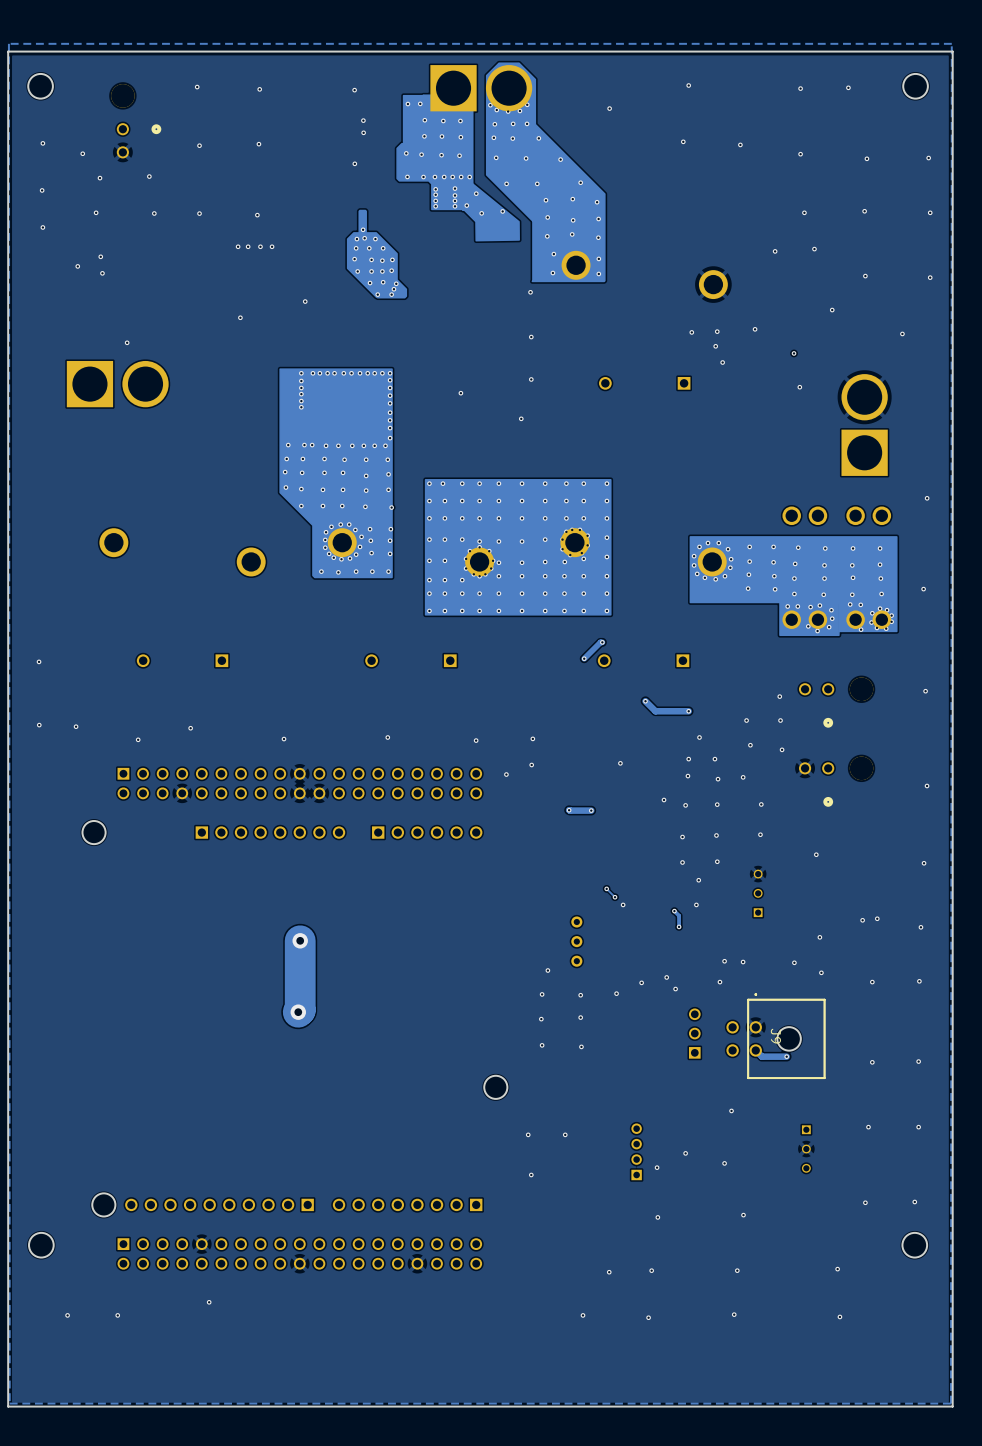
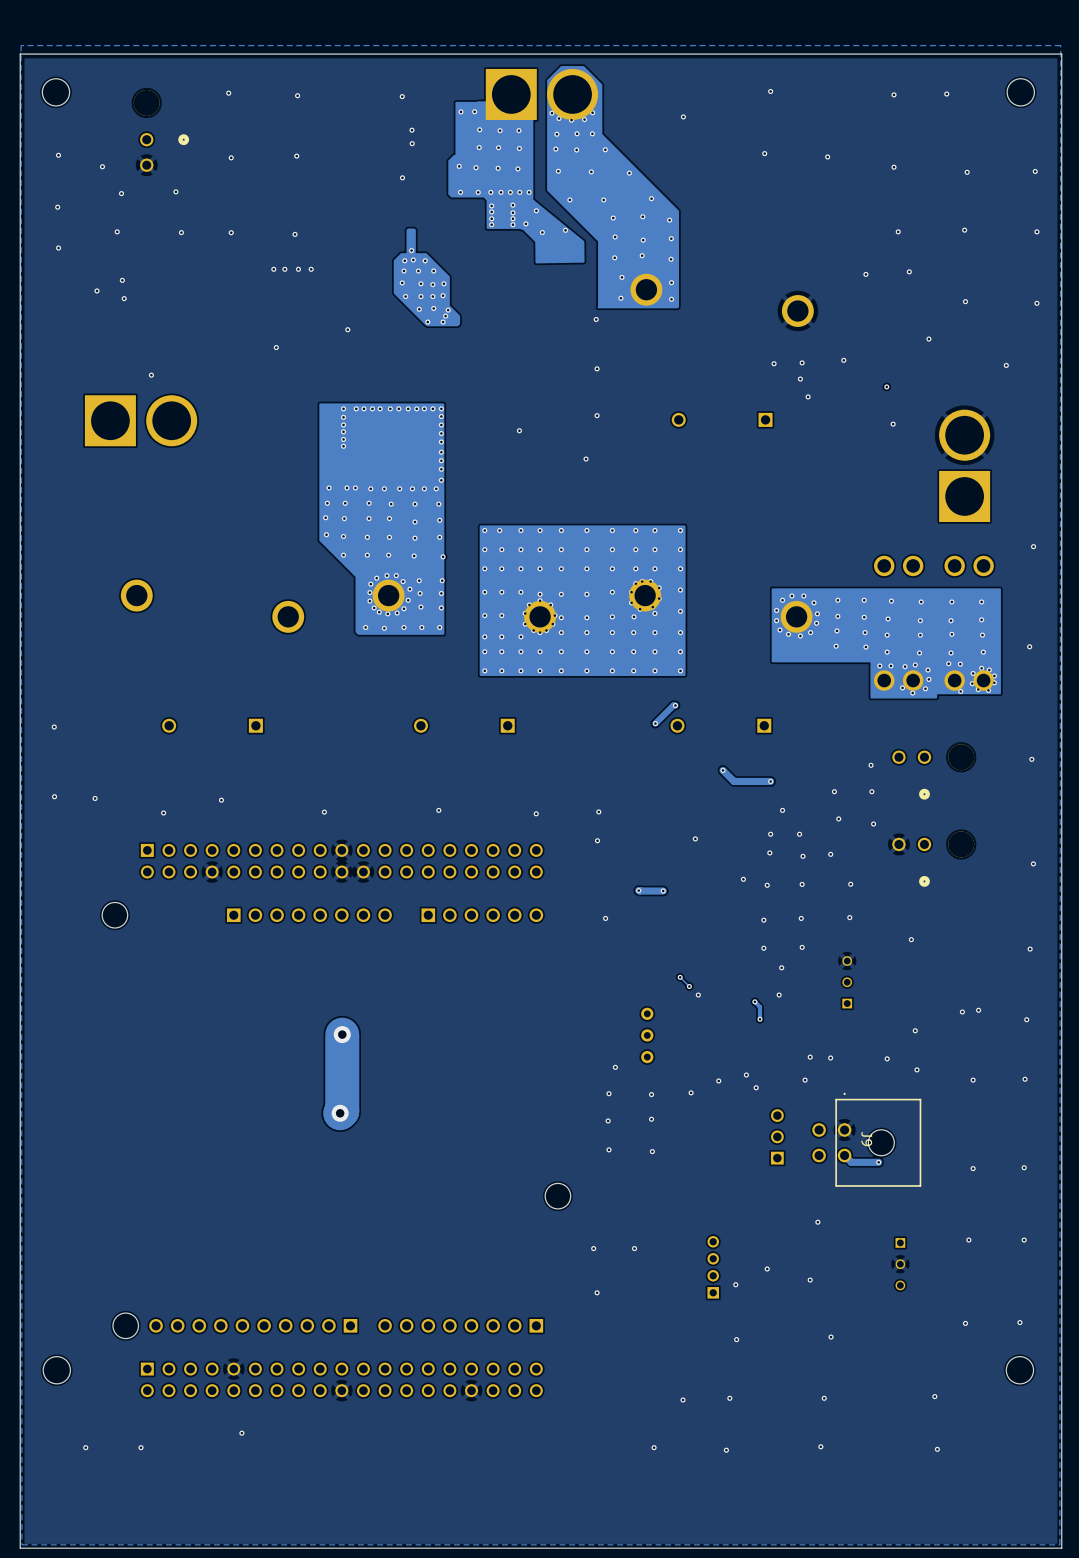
via: (506, 774) -> none
via: none -> (605, 918)

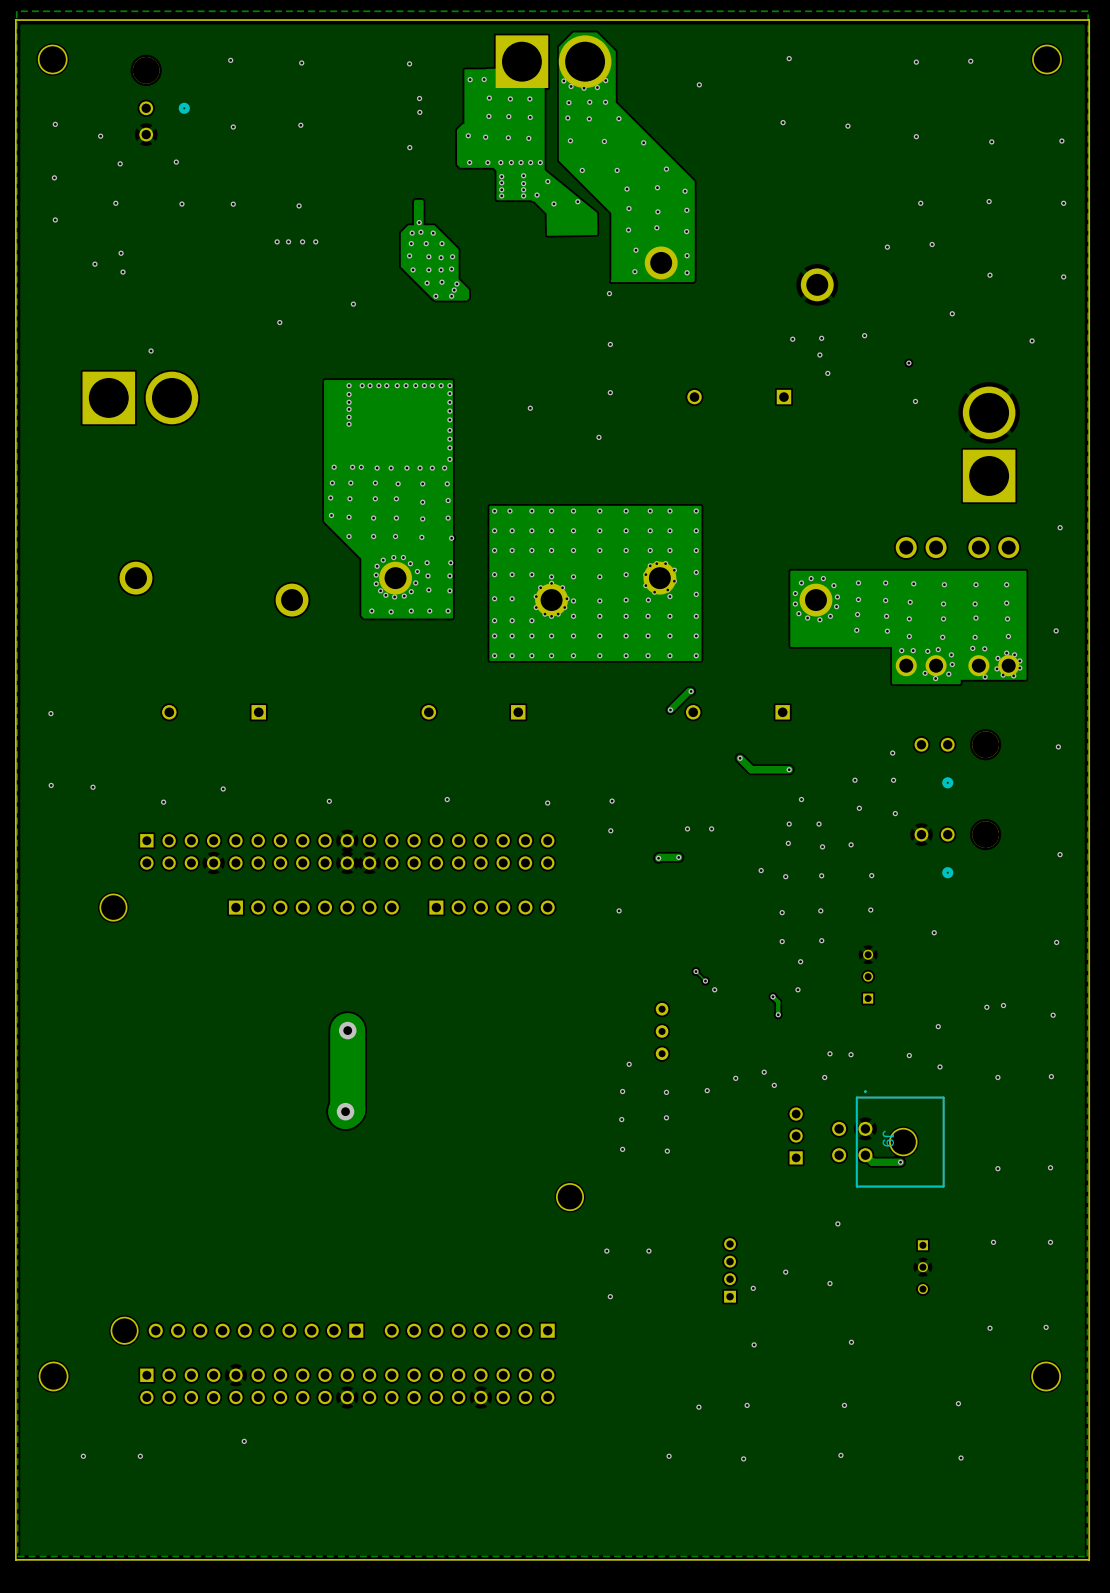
via: none -> (687, 828)
track: none -> (678, 857) (658, 858)
via: none -> (678, 857)
via: none -> (658, 858)
track: (638, 890) (663, 891) -> none
via: (638, 890) -> none
via: (663, 891) -> none

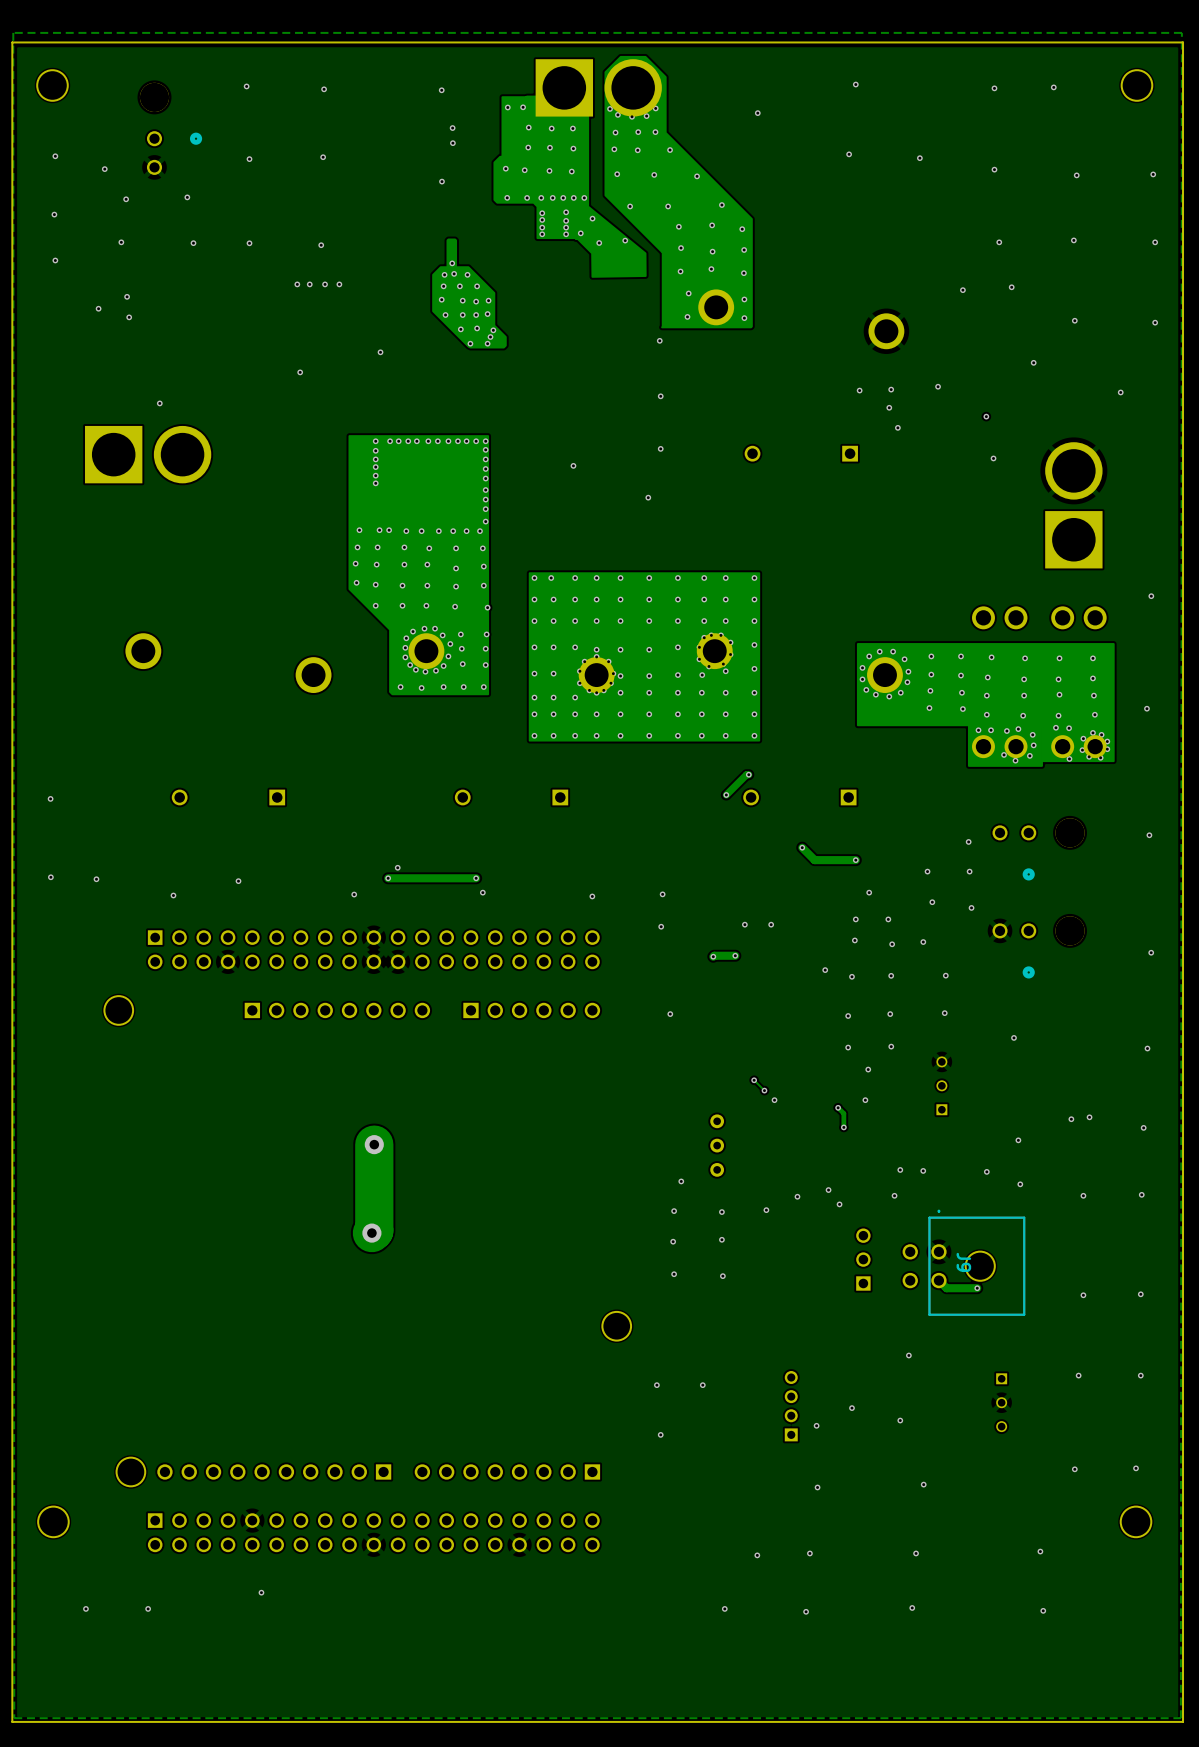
via: none -> (397, 867)
via: none -> (388, 878)
track: none -> (476, 878) (388, 878)
via: none -> (476, 878)

